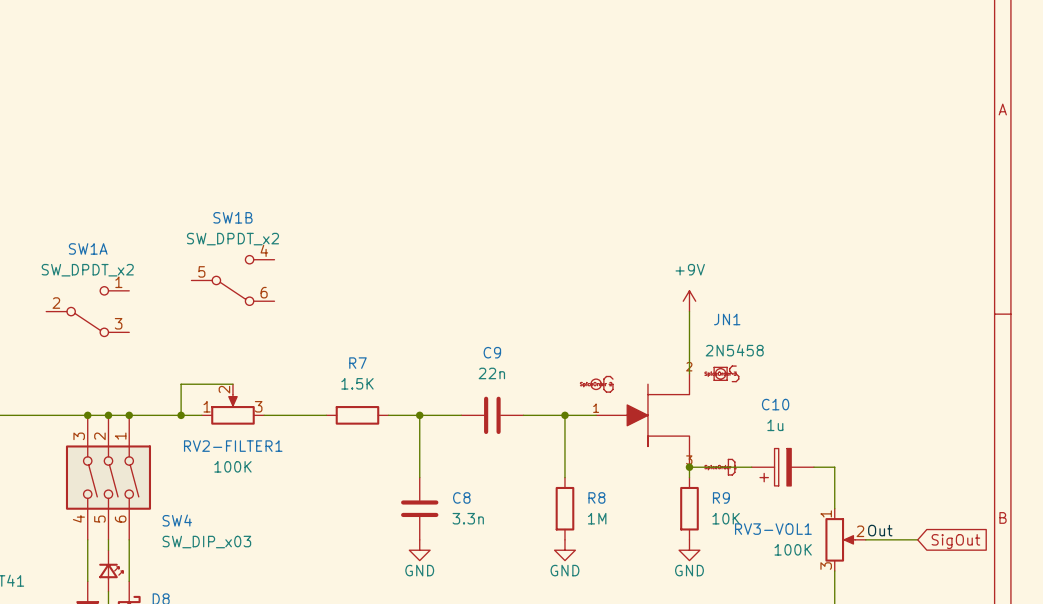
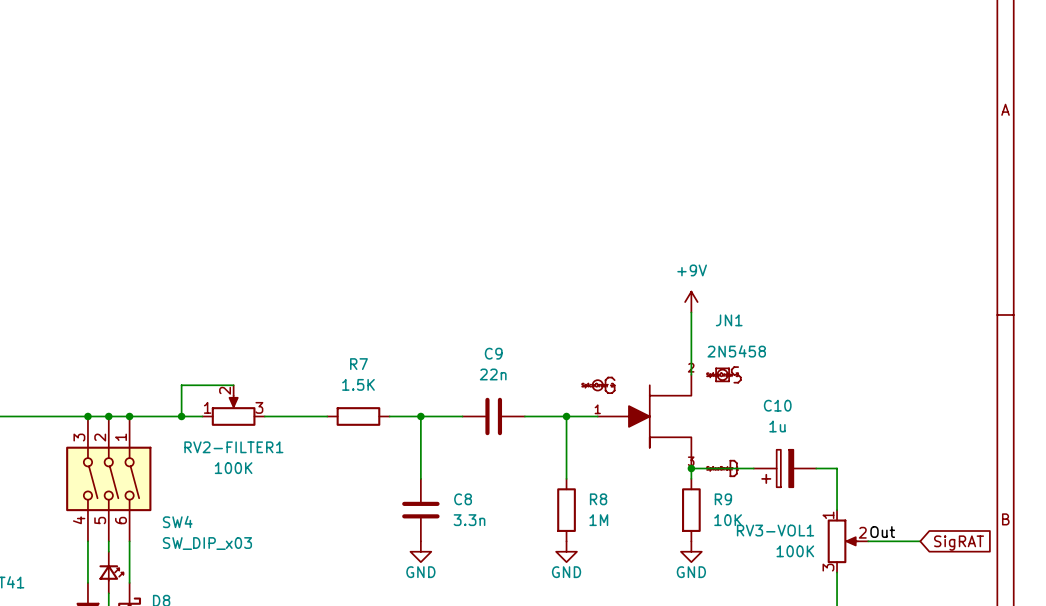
SW1B: SW_DPDT_x2 (232, 280) -> none
SW1A: SW_DPDT_x2 (87, 311) -> none
global label: SigOut (955, 541) -> SigRAT (959, 543)

